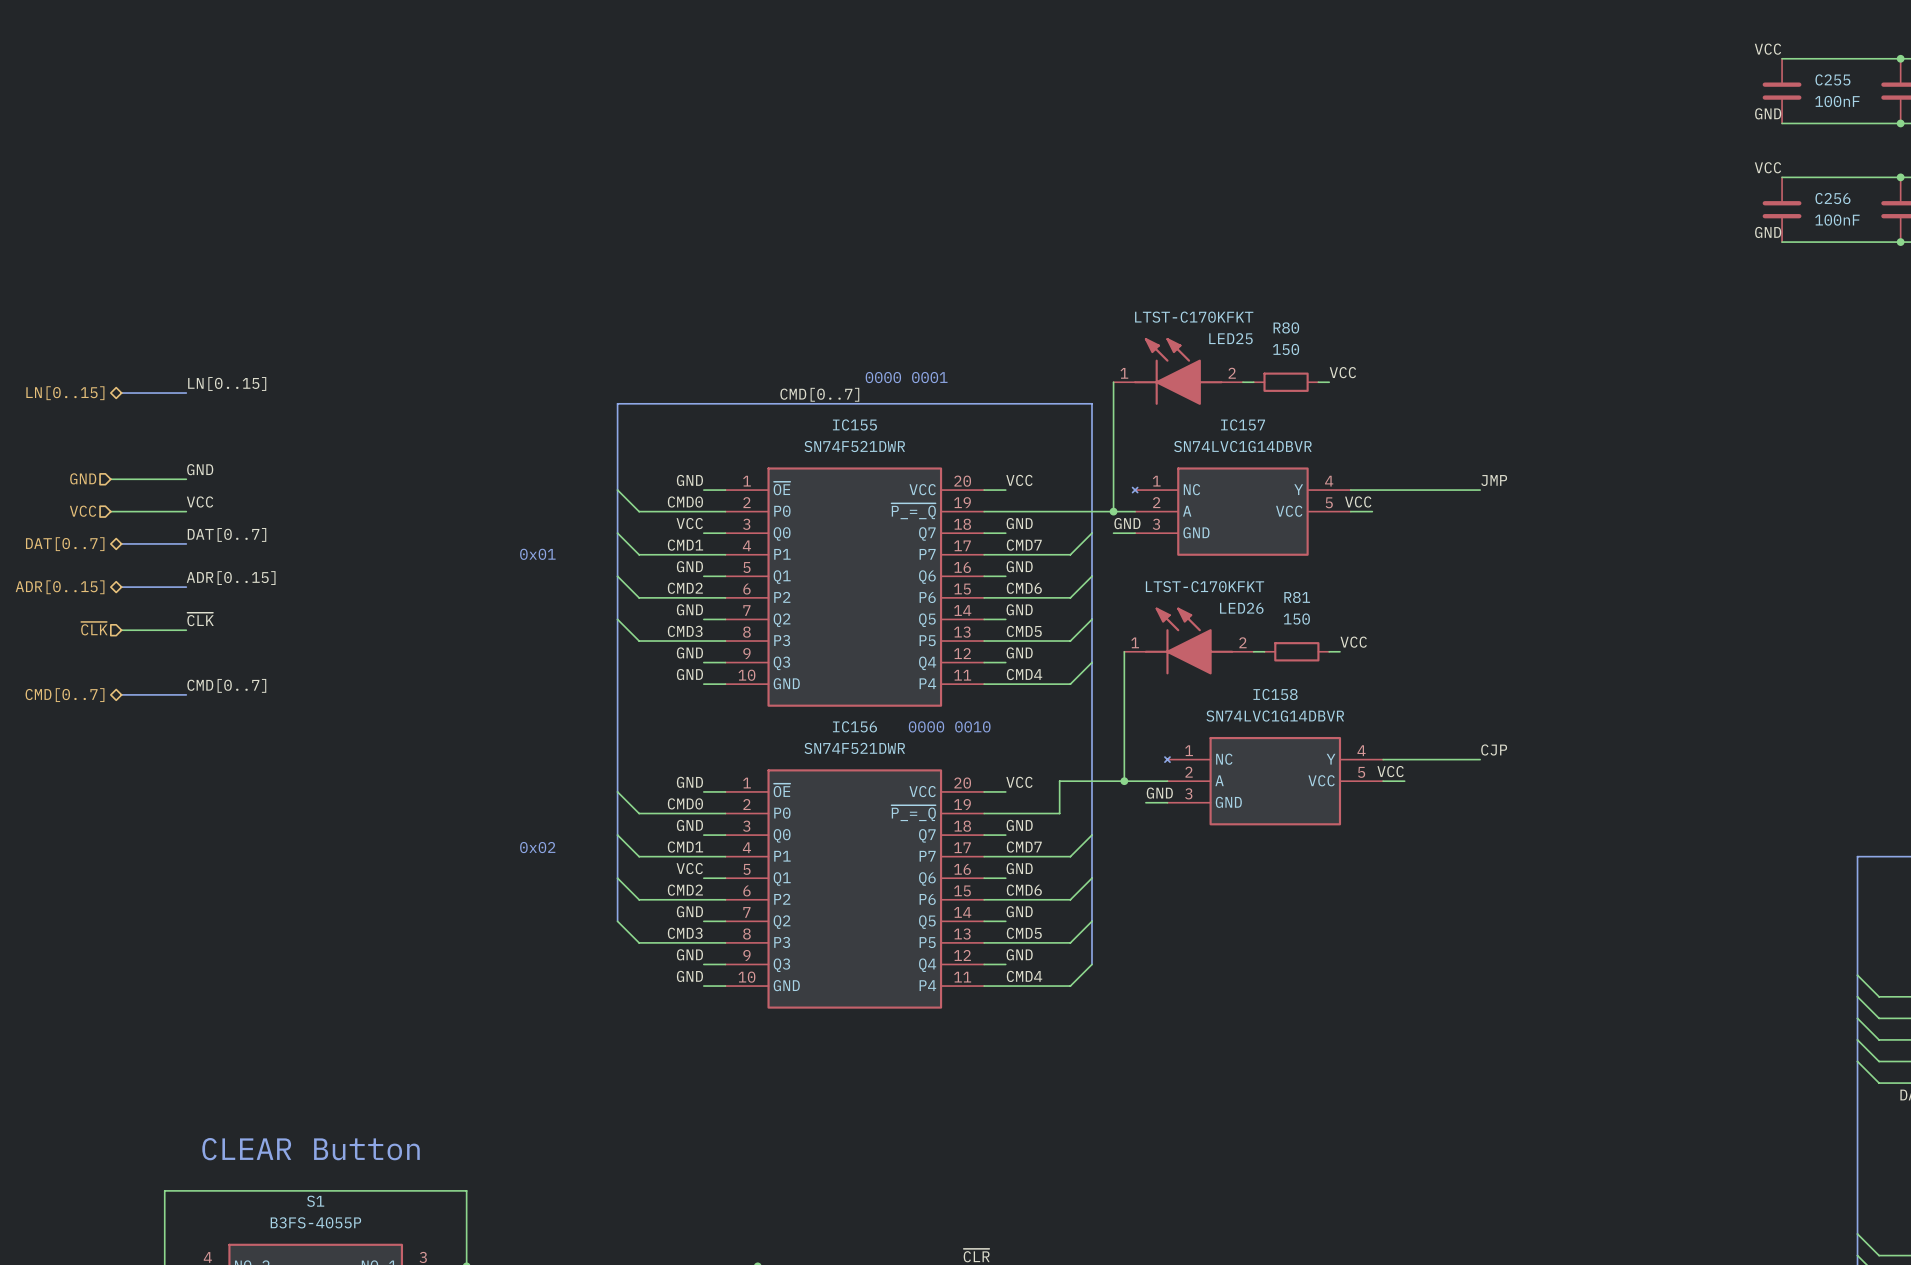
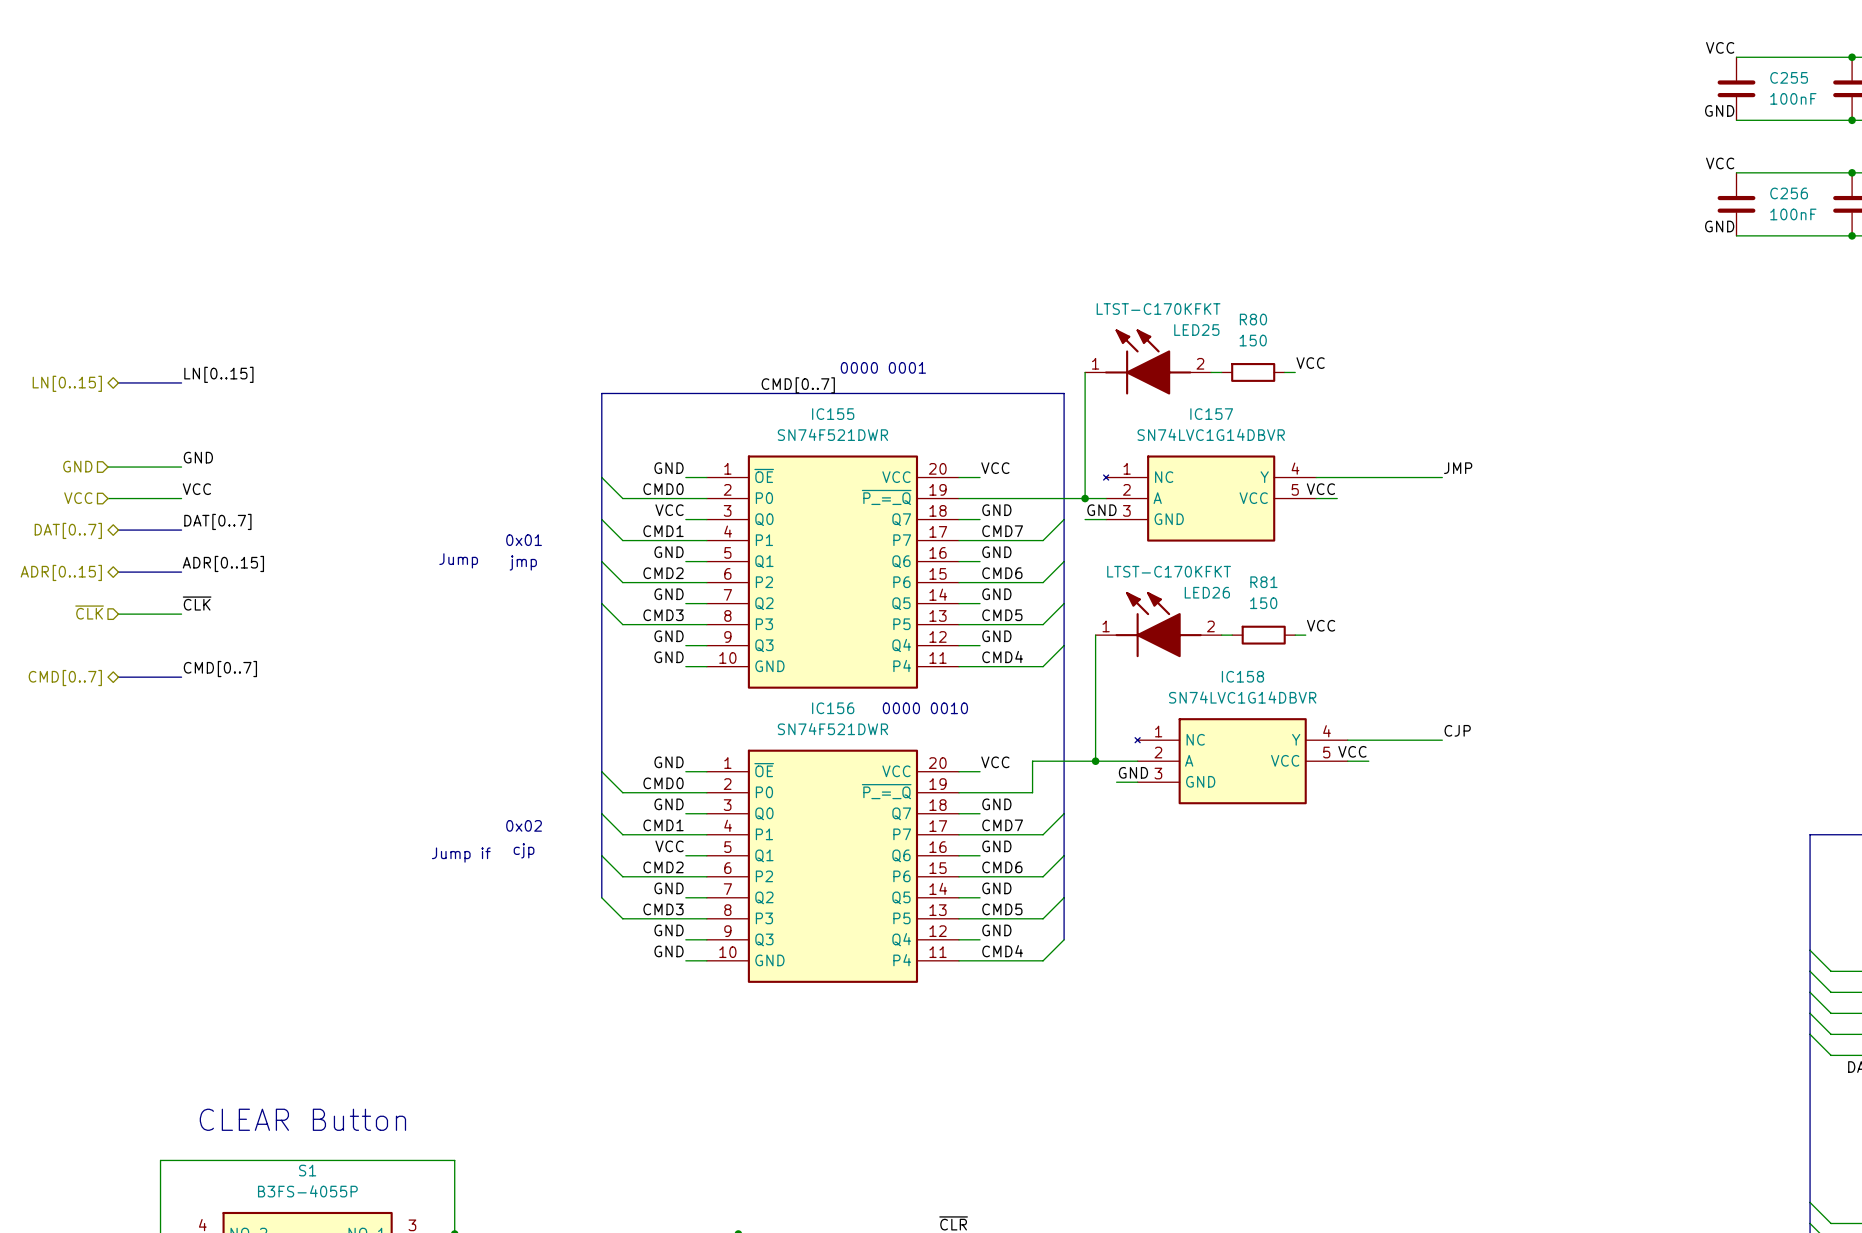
text: none -> Jump (458, 560)
text: none -> jmp (523, 562)
text: none -> cjp (524, 850)
text: none -> Jump if (461, 855)

